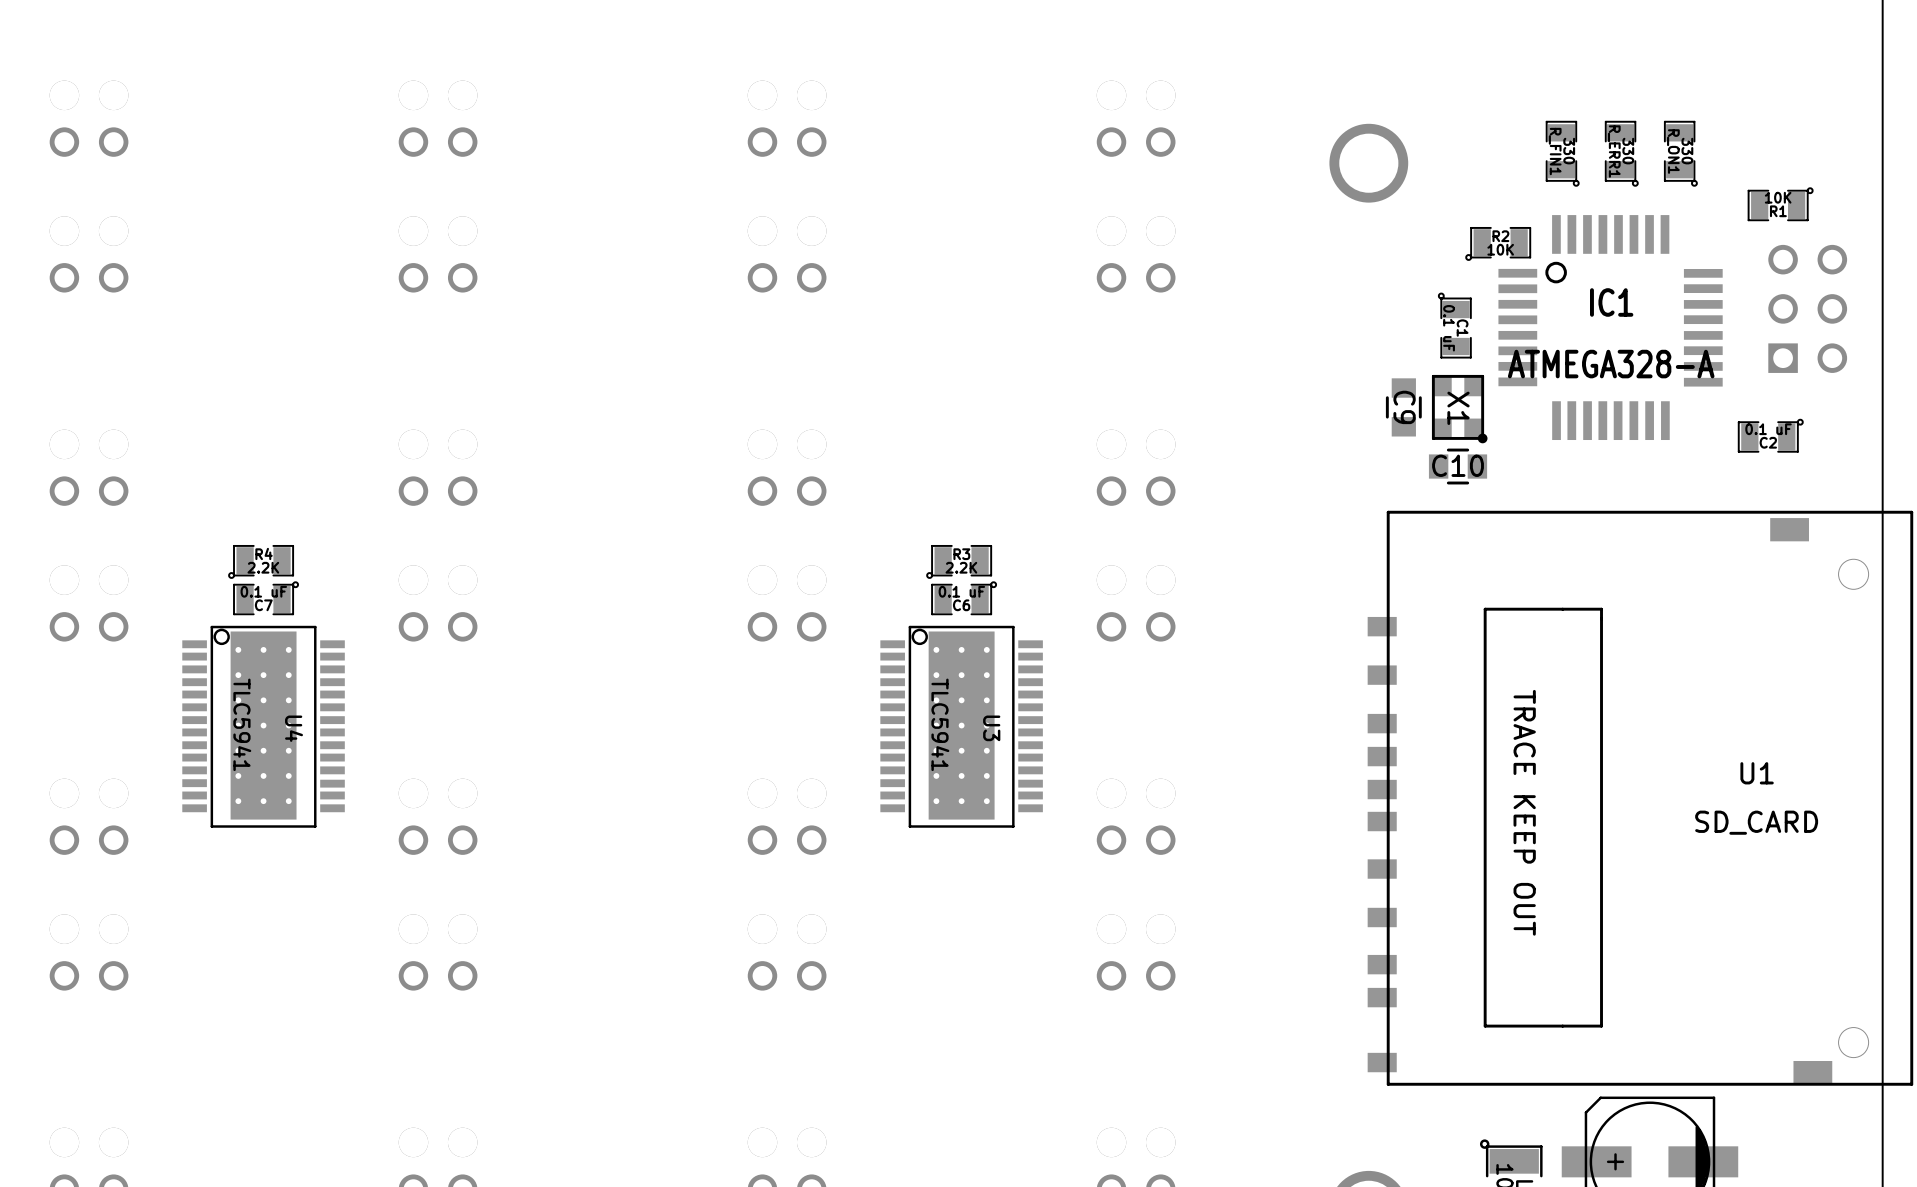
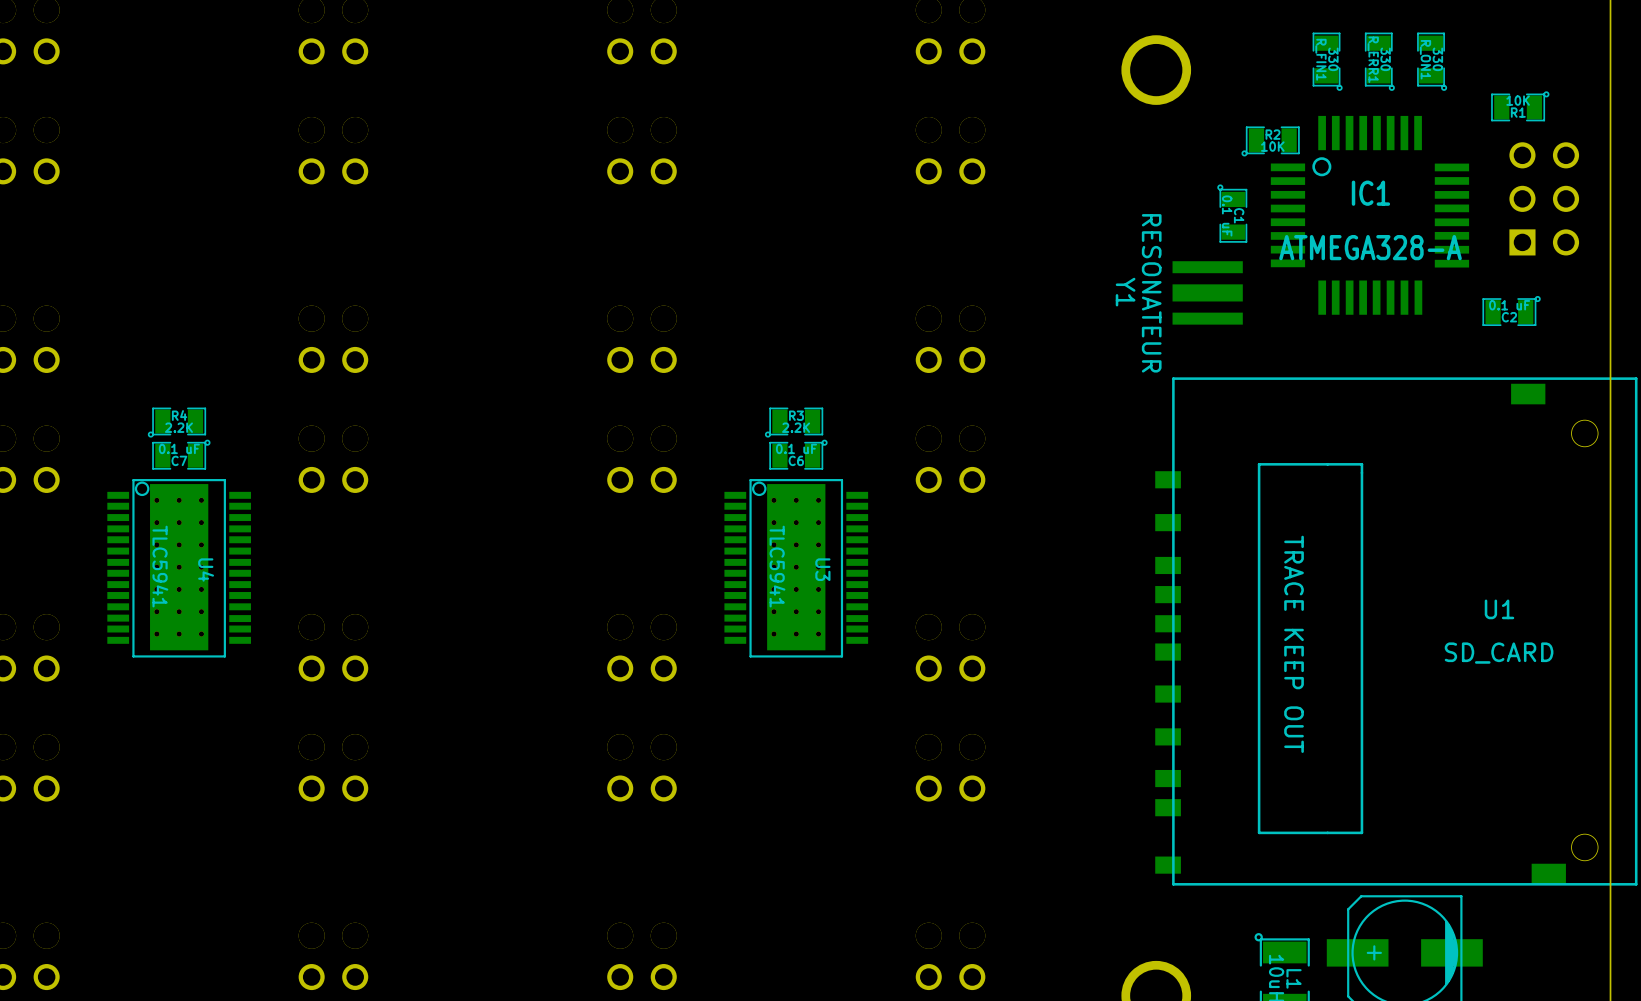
C9: (1403, 407) -> none
X1: (1459, 409) -> none
Y1: none -> RESONATEUR (1207, 292)
C10: (1458, 466) -> none

